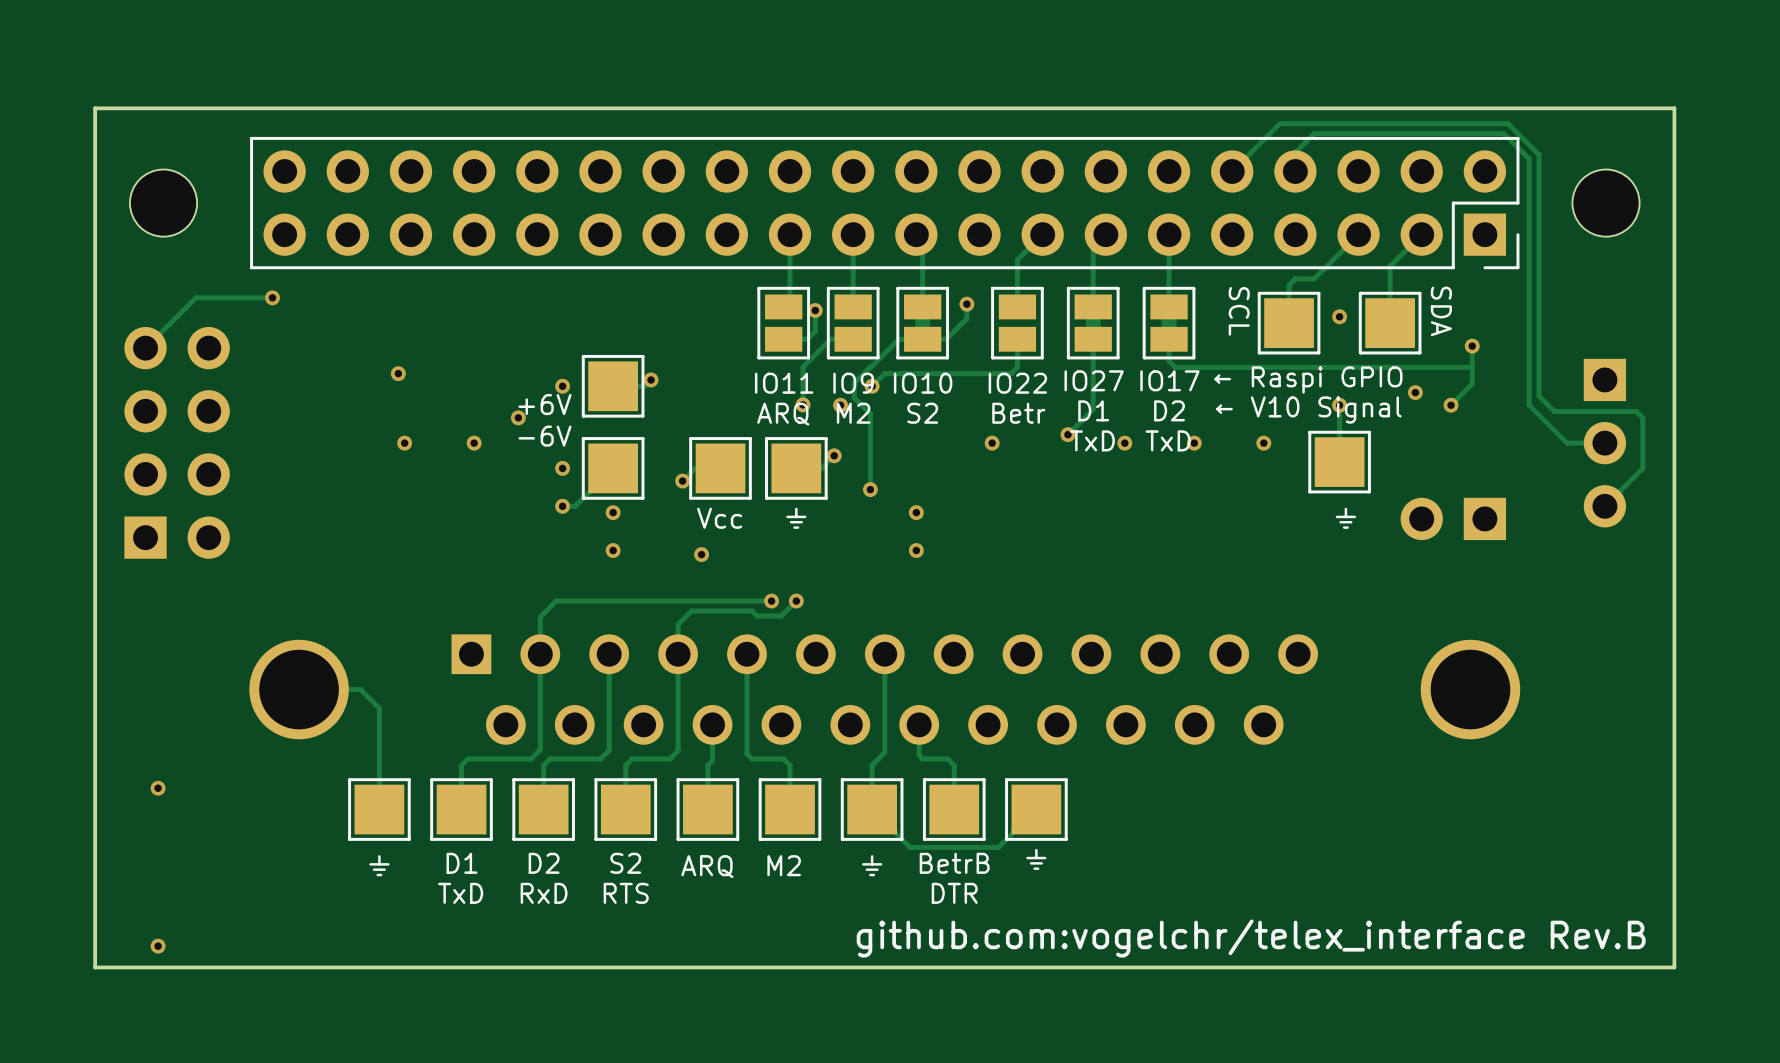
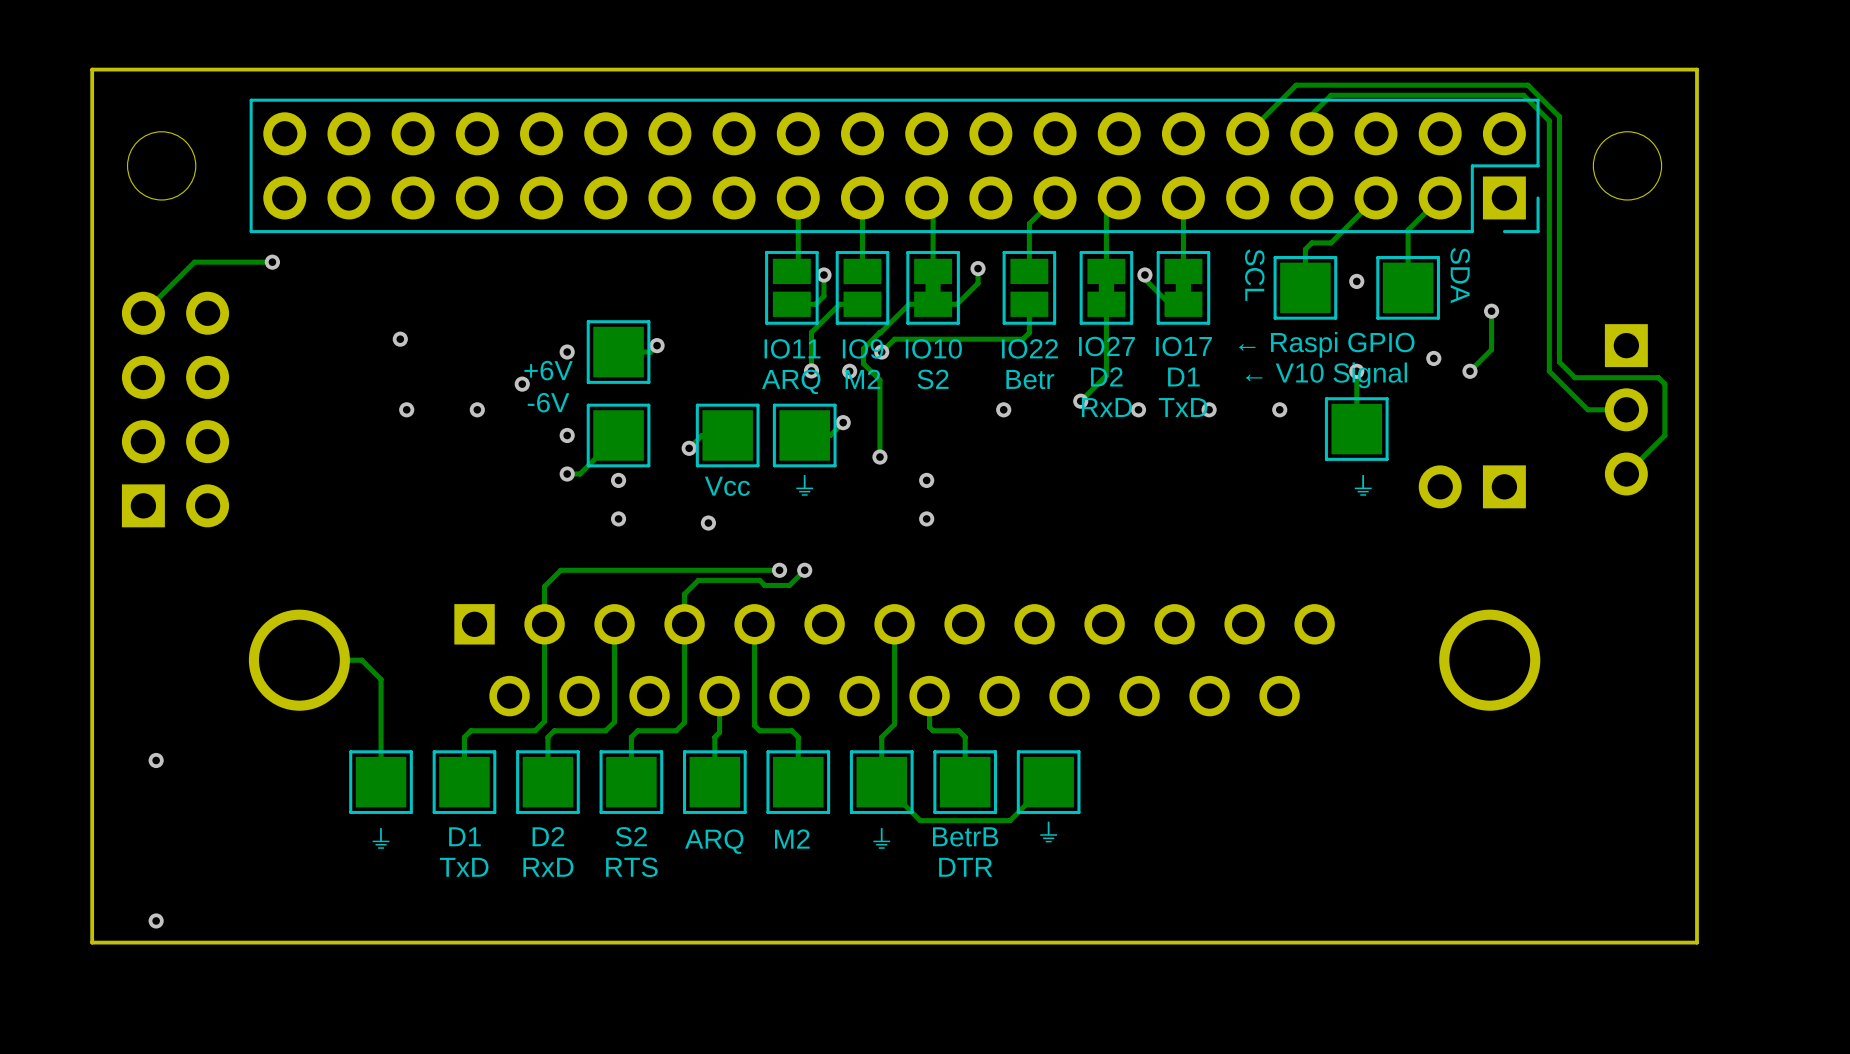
track: none -> (1144, 275) (1144, 279) (1169, 304)
via: none -> (1144, 275)
track: (1169, 339) (1169, 361) (1175, 367) (1472, 367) -> none
text: D1 (1093, 410) -> D2 (1106, 376)
text: D2 (1169, 410) -> D1 (1183, 377)
text: TxD (1092, 440) -> RxD (1106, 407)
text: github.com:vogelchr/telex_interface Rev.B (1251, 938) -> none

